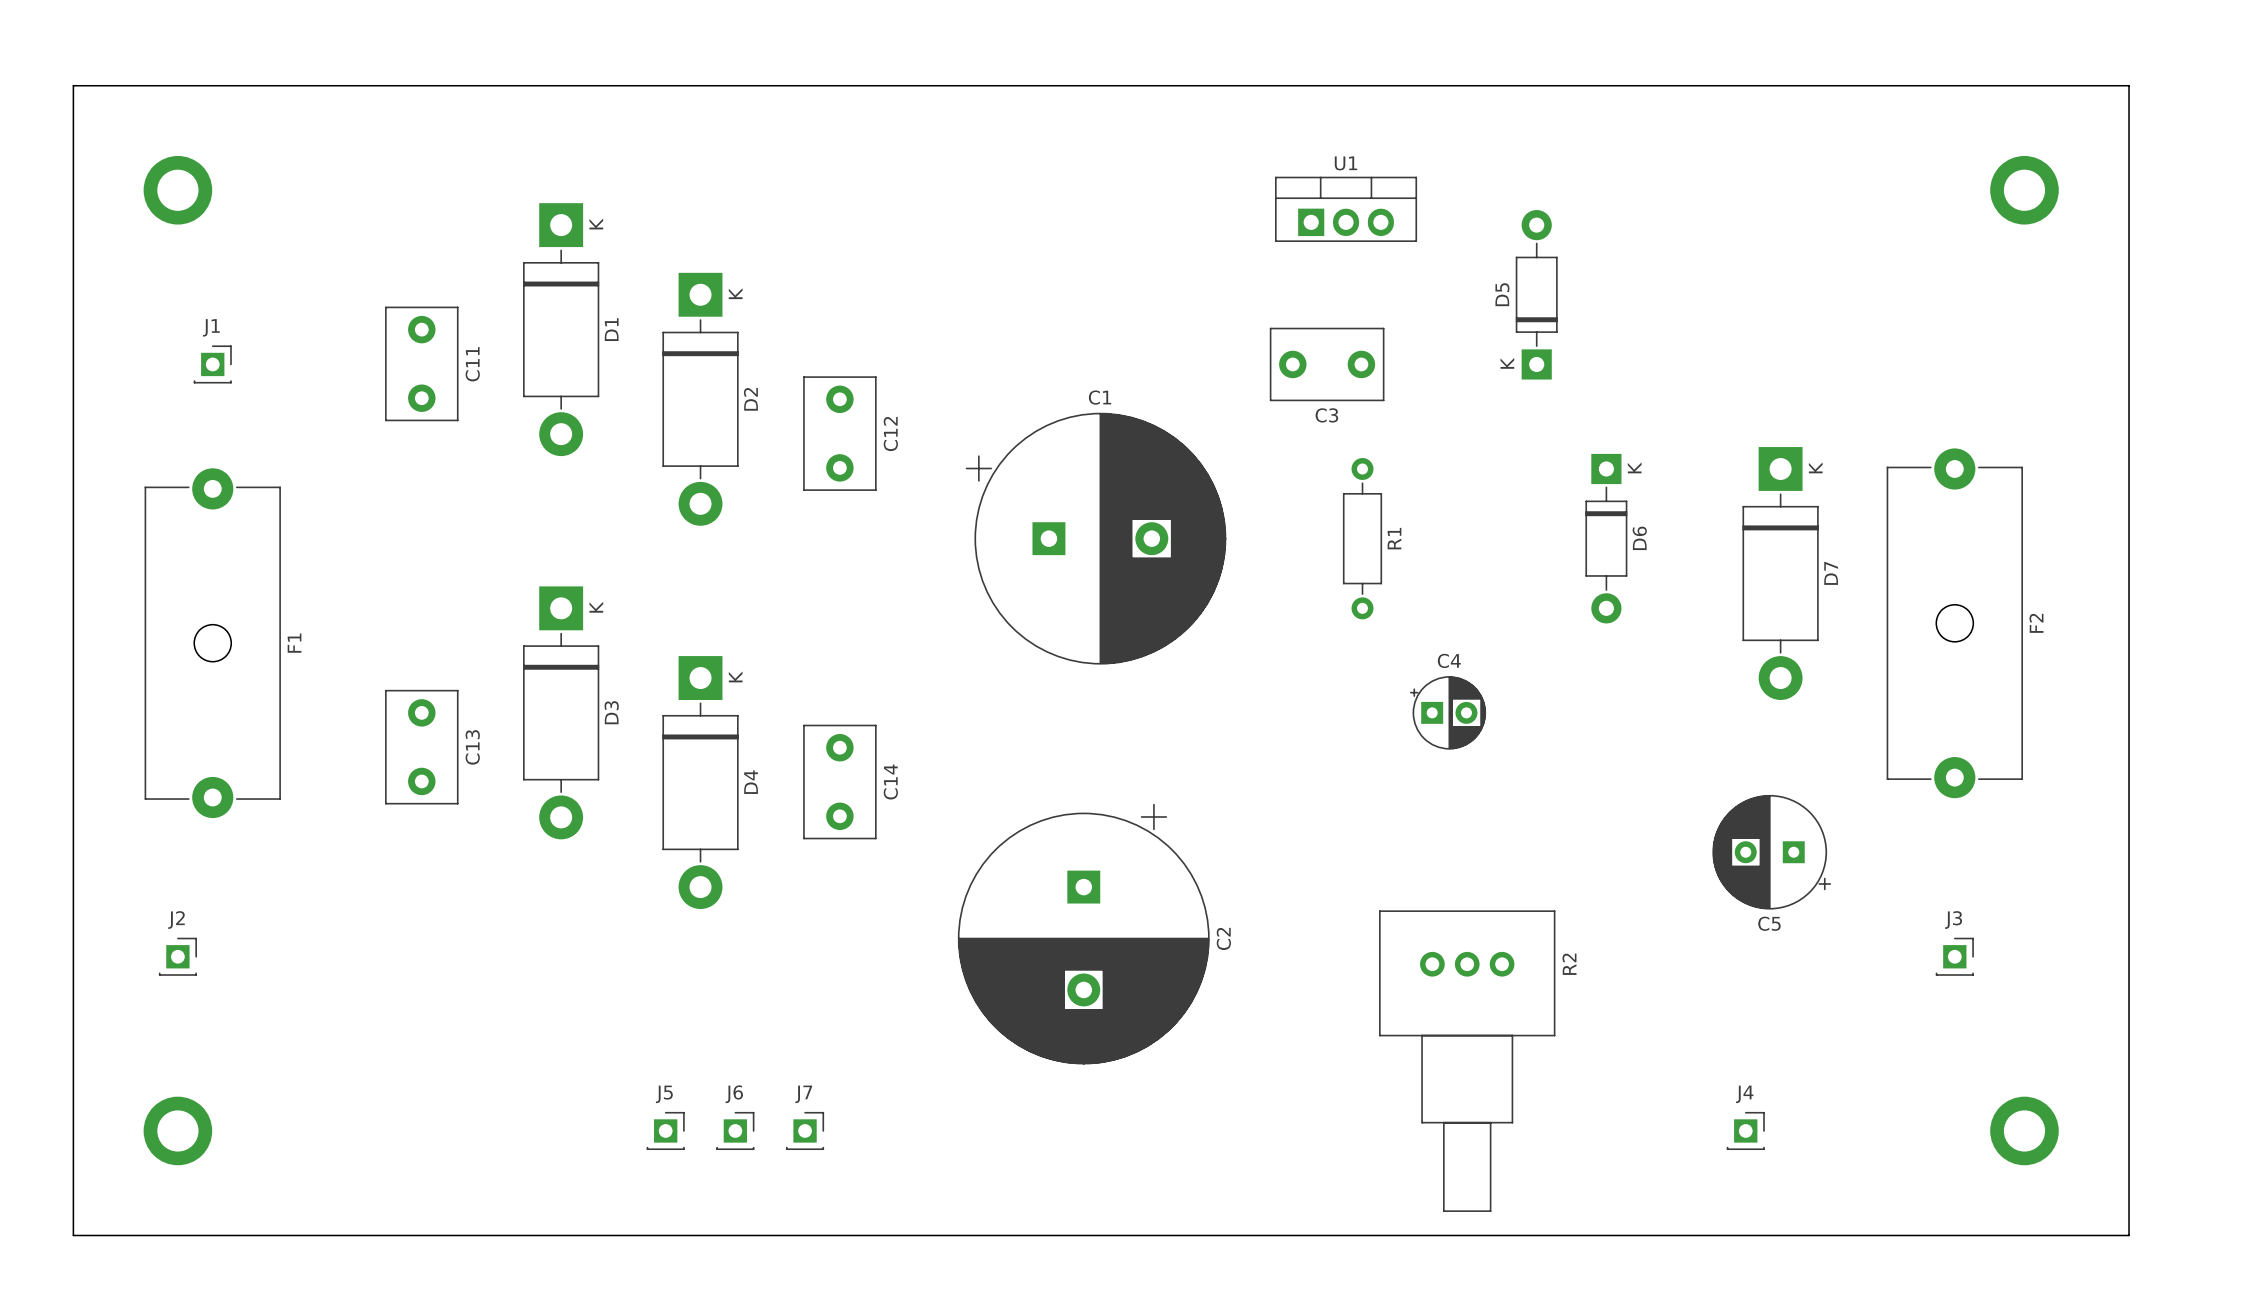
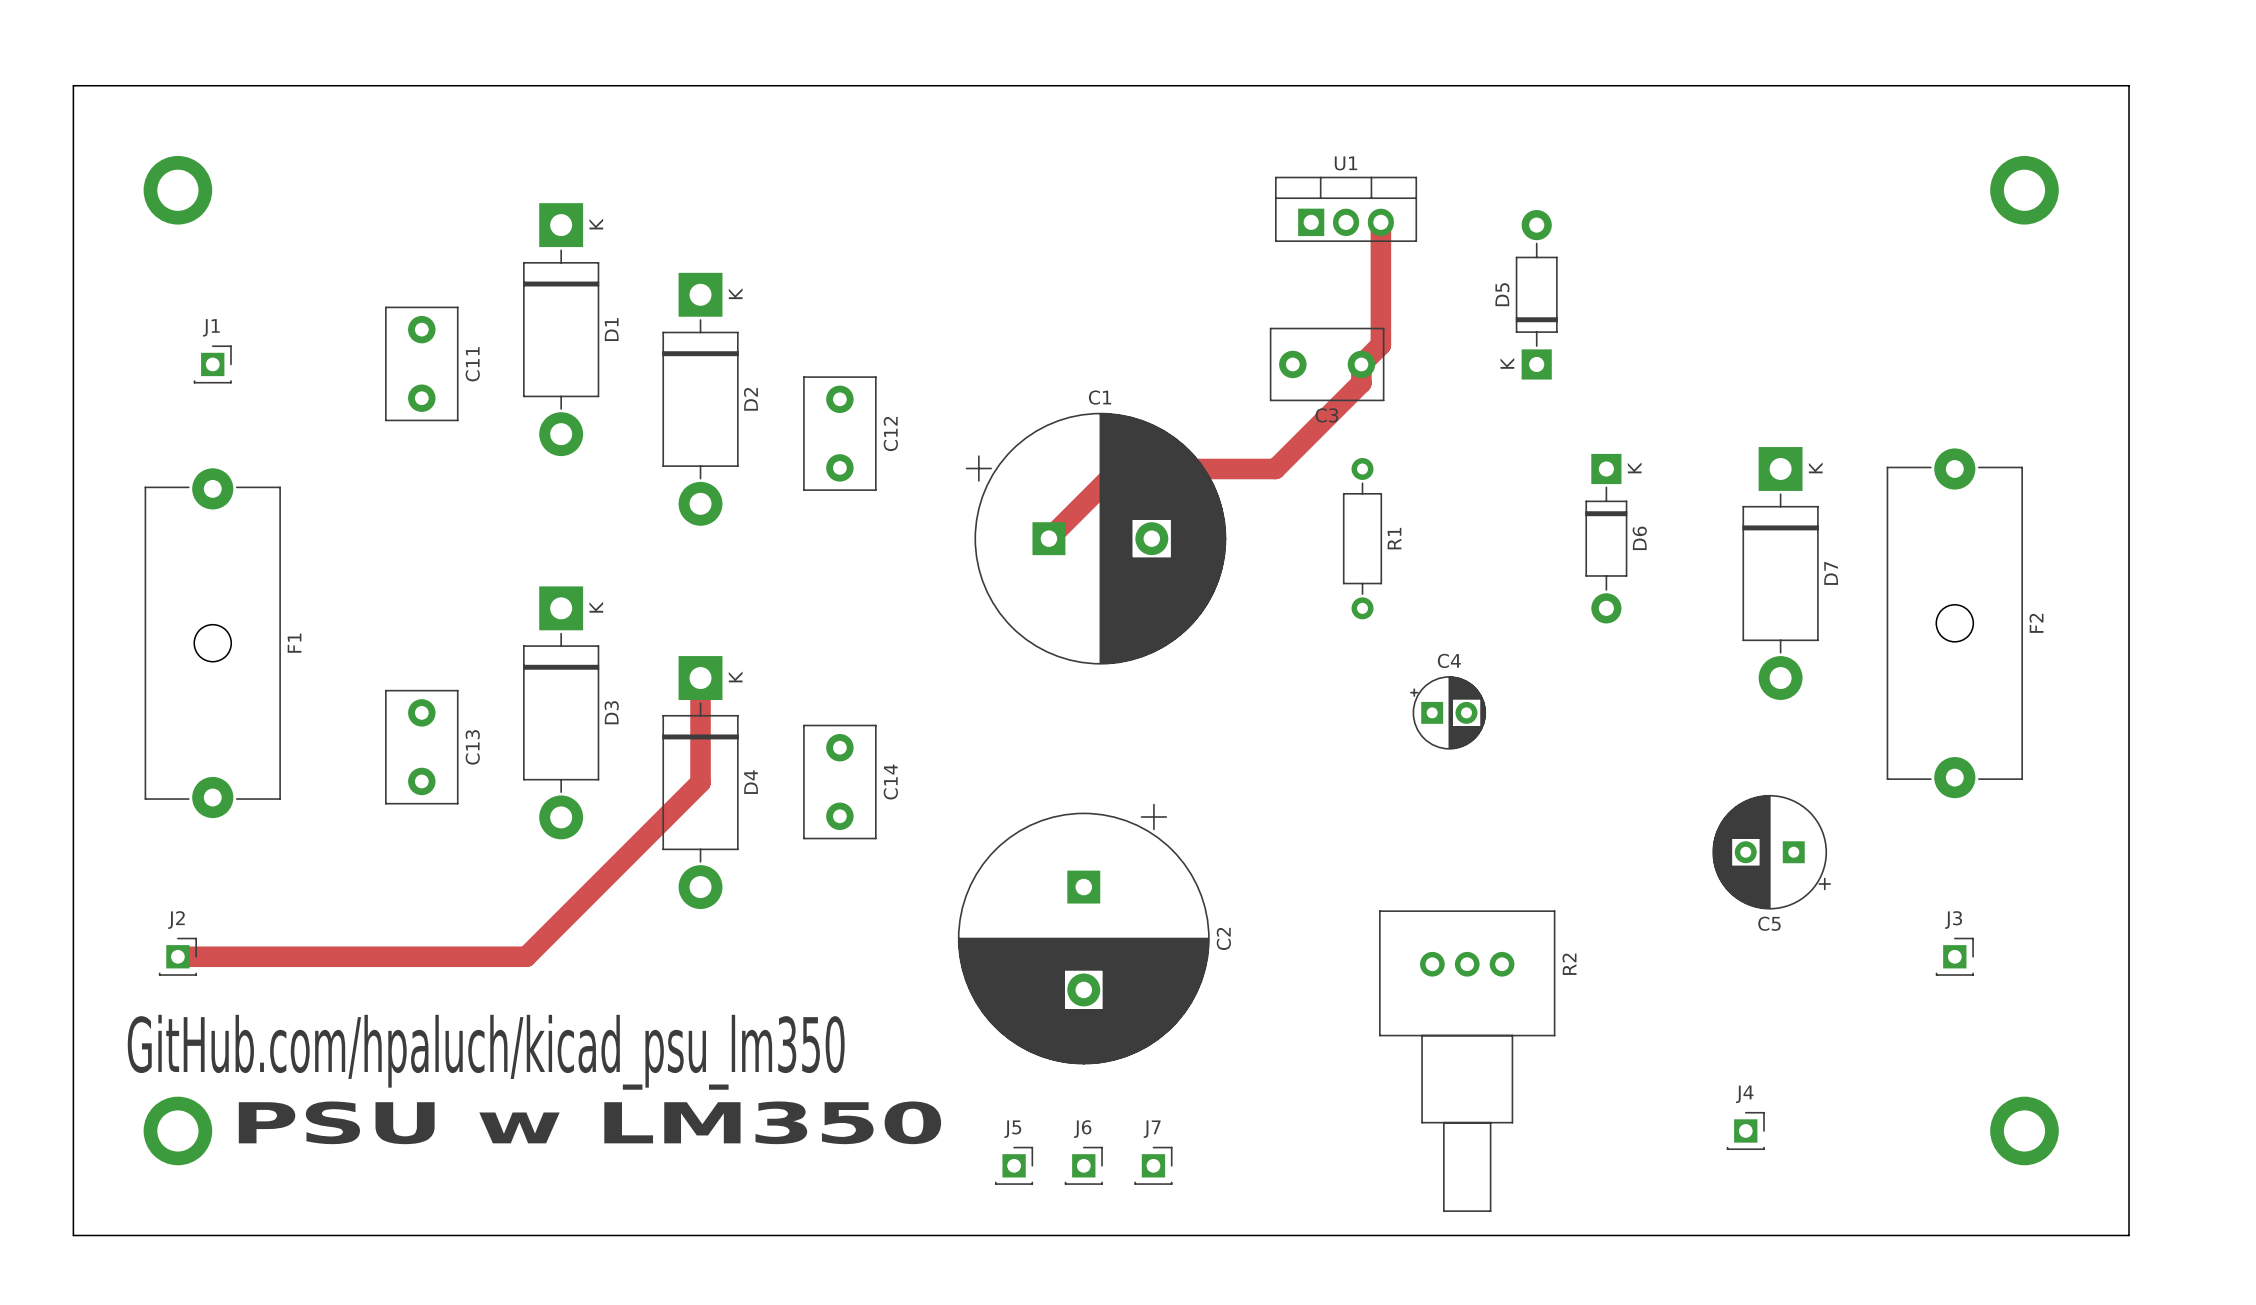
track: none -> (1380, 222) (1380, 344) (1361, 364) (1361, 382) (1275, 468) (1118, 468) (1048, 538)
track: none -> (700, 678) (700, 782) (526, 956) (177, 956)
text: none -> GitHub.com/hpaluch/kicad_psu_lm350 (486, 1052)
text: none -> PSU w LM350 (589, 1122)
J5 position: (665, 1130) -> (1014, 1165)
J6 position: (735, 1130) -> (1083, 1165)
J7 position: (805, 1130) -> (1153, 1165)

